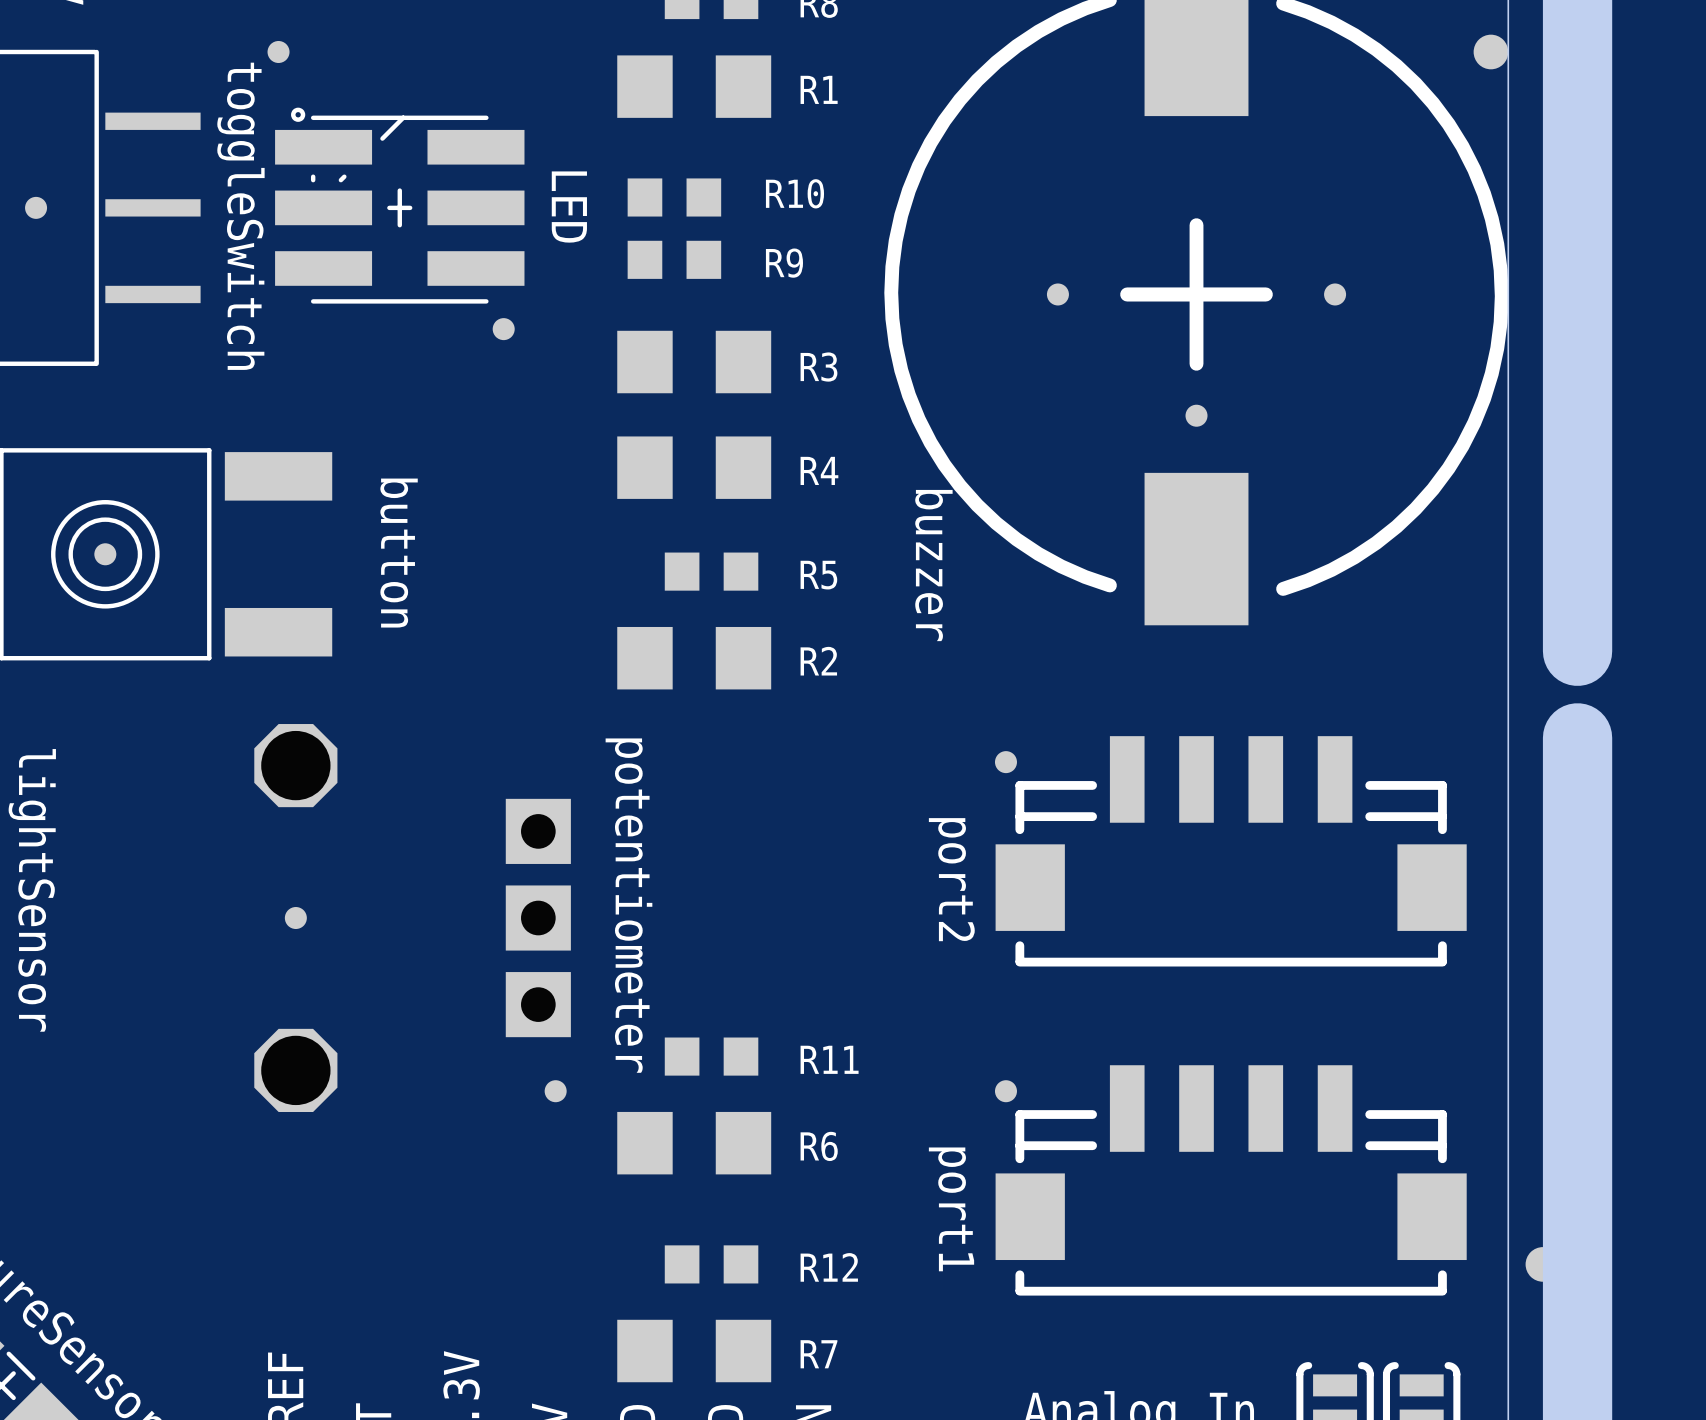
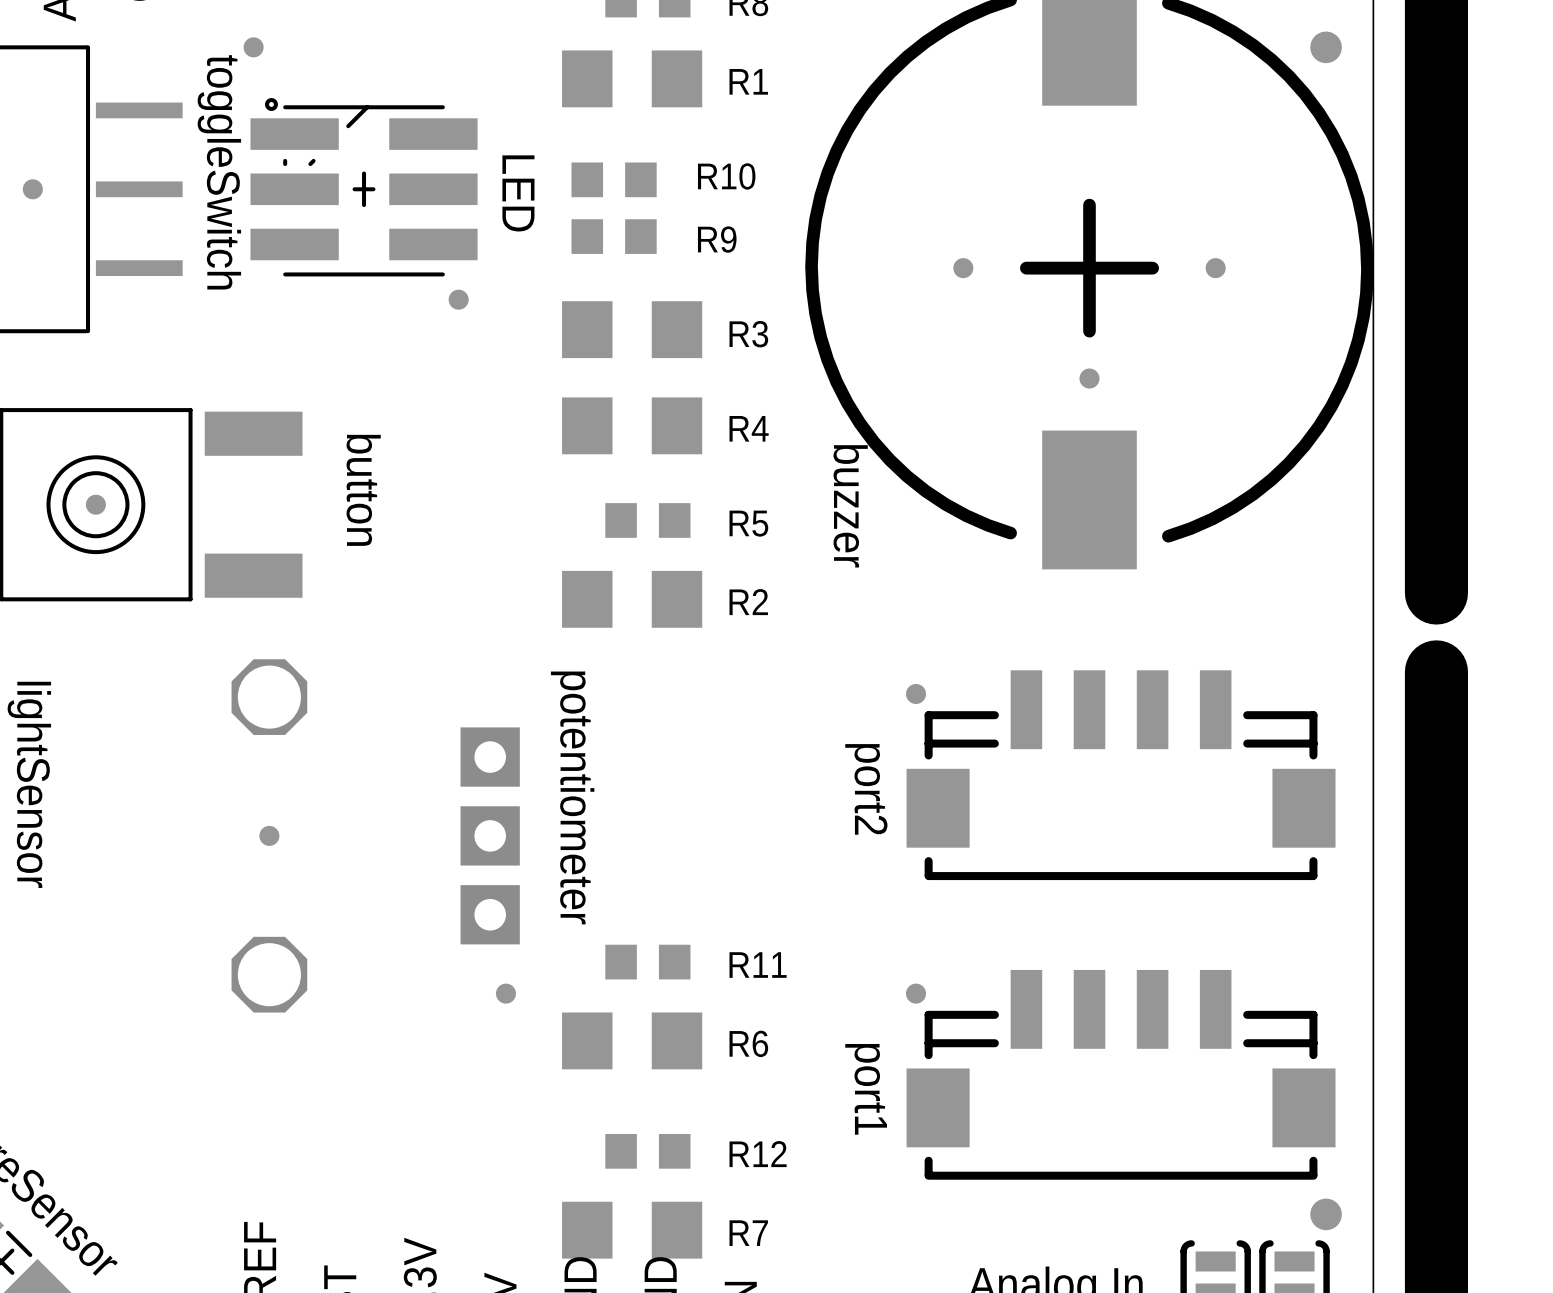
part position: (1490, 51) -> (1326, 47)
part position: (1542, 1264) -> (1326, 1214)

